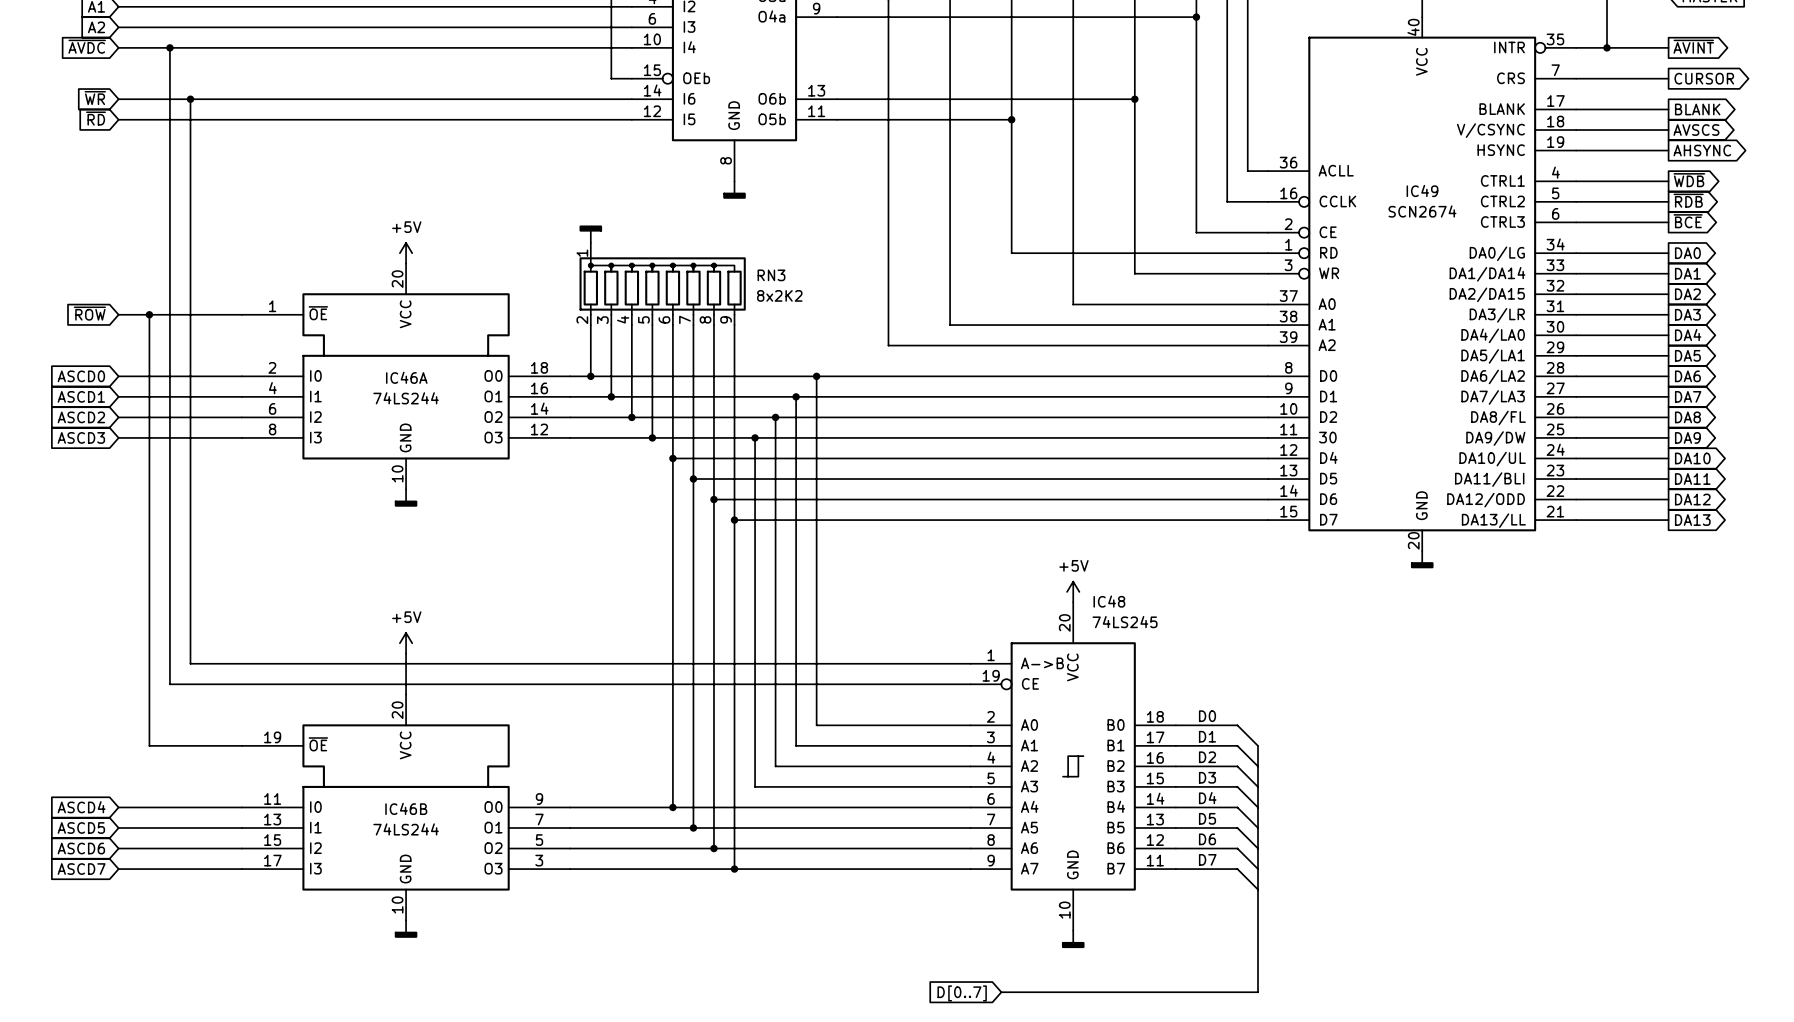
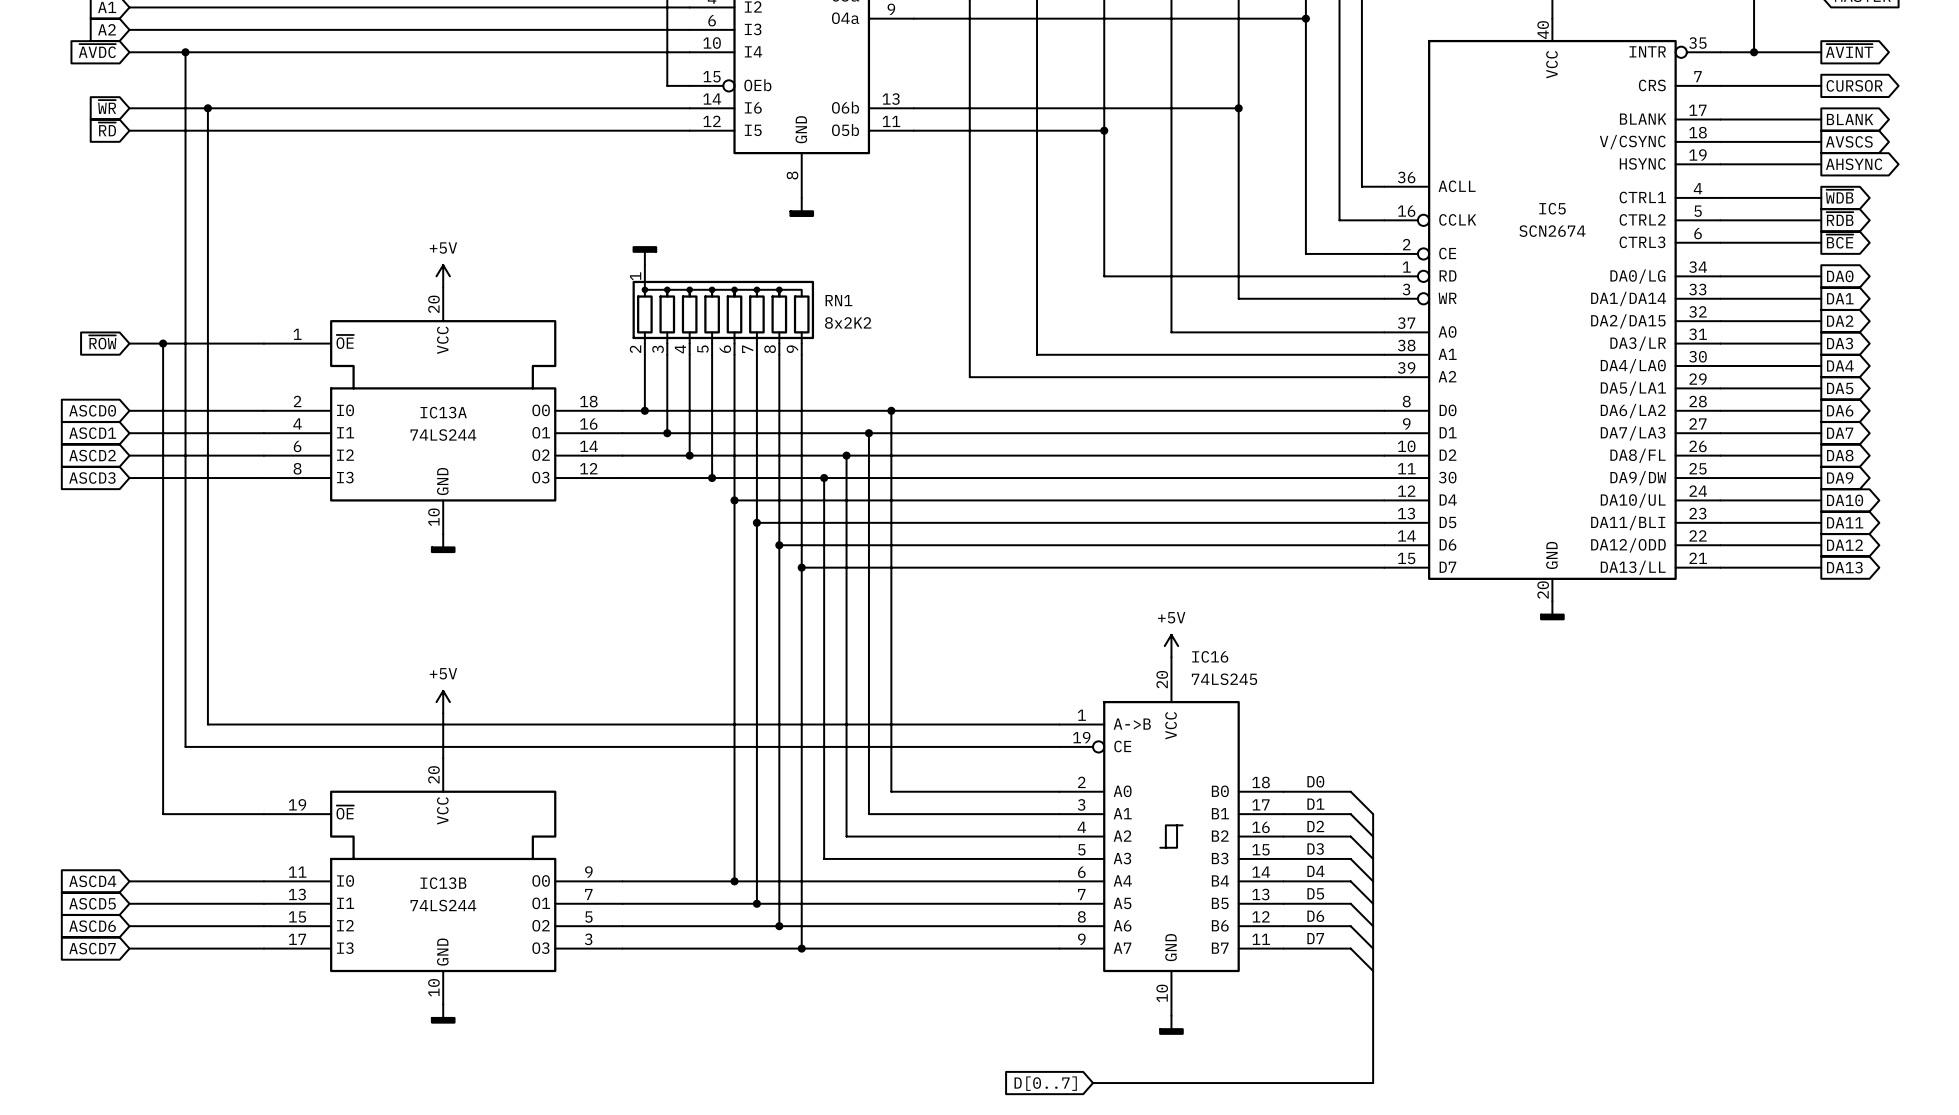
IC49 name: IC49 (1422, 190) -> IC5 (1552, 208)
RN3 name: RN3 (771, 275) -> RN1 (838, 300)
IC46A name: IC46A (406, 377) -> IC13A (443, 412)
IC48 name: IC48 (1109, 601) -> IC16 (1210, 656)
IC46B name: IC46B (406, 808) -> IC13B (443, 883)

